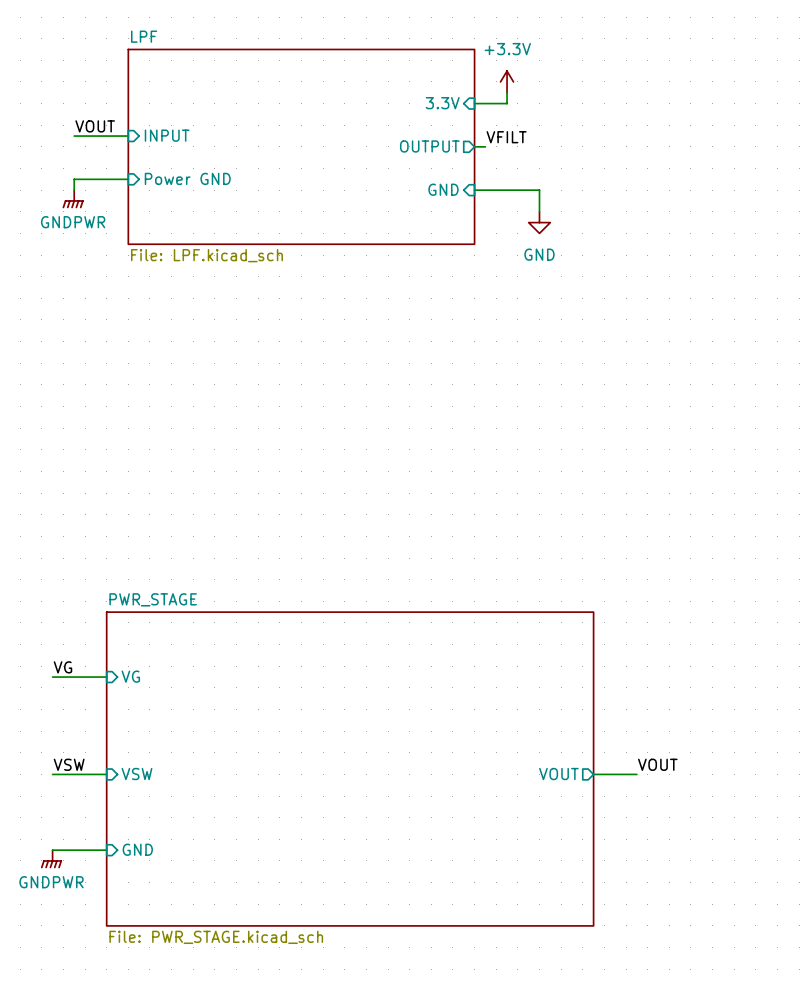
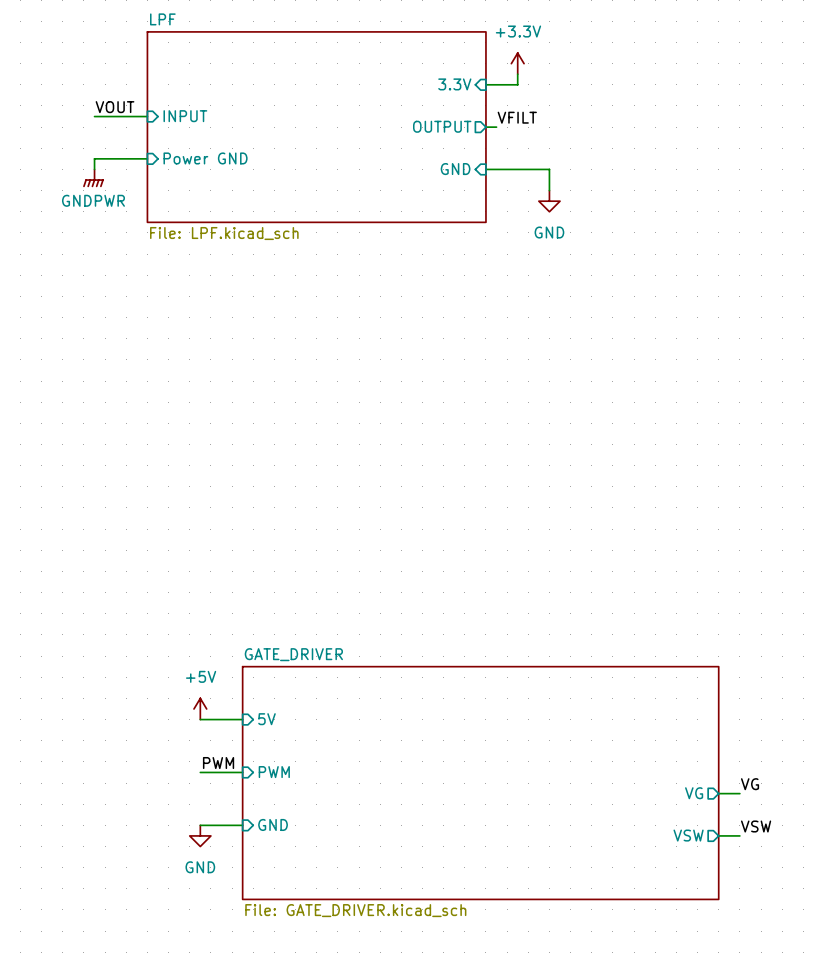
label: VG (62, 667) -> none
sheet pin: VG (130, 676) -> none
wire: (52, 677) (106, 677) -> none
power symbol: none -> +5V (200, 708)
wire: none -> (200, 719) (242, 719)
sheet pin: none -> 5V (266, 719)
label: VSW (69, 764) -> none
label: VOUT (657, 764) -> none
sheet PWR_STAGE: File: PWR_STAGE.kicad_sch (350, 769) -> none
wire: (52, 774) (106, 774) -> none
sheet pin: VSW (136, 774) -> none
sheet pin: VOUT (558, 774) -> none
wire: (593, 774) (636, 774) -> none
label: none -> PWM (218, 763)
wire: none -> (200, 772) (242, 772)
sheet pin: none -> PWM (274, 772)
sheet GATE_DRIVER: none -> File: GATE_DRIVER.kicad_sch (480, 783)
label: none -> VG (750, 784)
sheet pin: none -> VG (694, 793)
wire: none -> (718, 793) (739, 793)
sheet pin position: GND (137, 849) -> GND (273, 824)
wire: (52, 850) (106, 850) -> none
power symbol: GNDPWR (51, 859) -> none
wire: none -> (200, 825) (242, 825)
label: none -> VSW (756, 826)
power symbol: none -> GND (200, 835)
sheet pin: none -> VSW (688, 835)
wire: none -> (718, 835) (739, 835)

